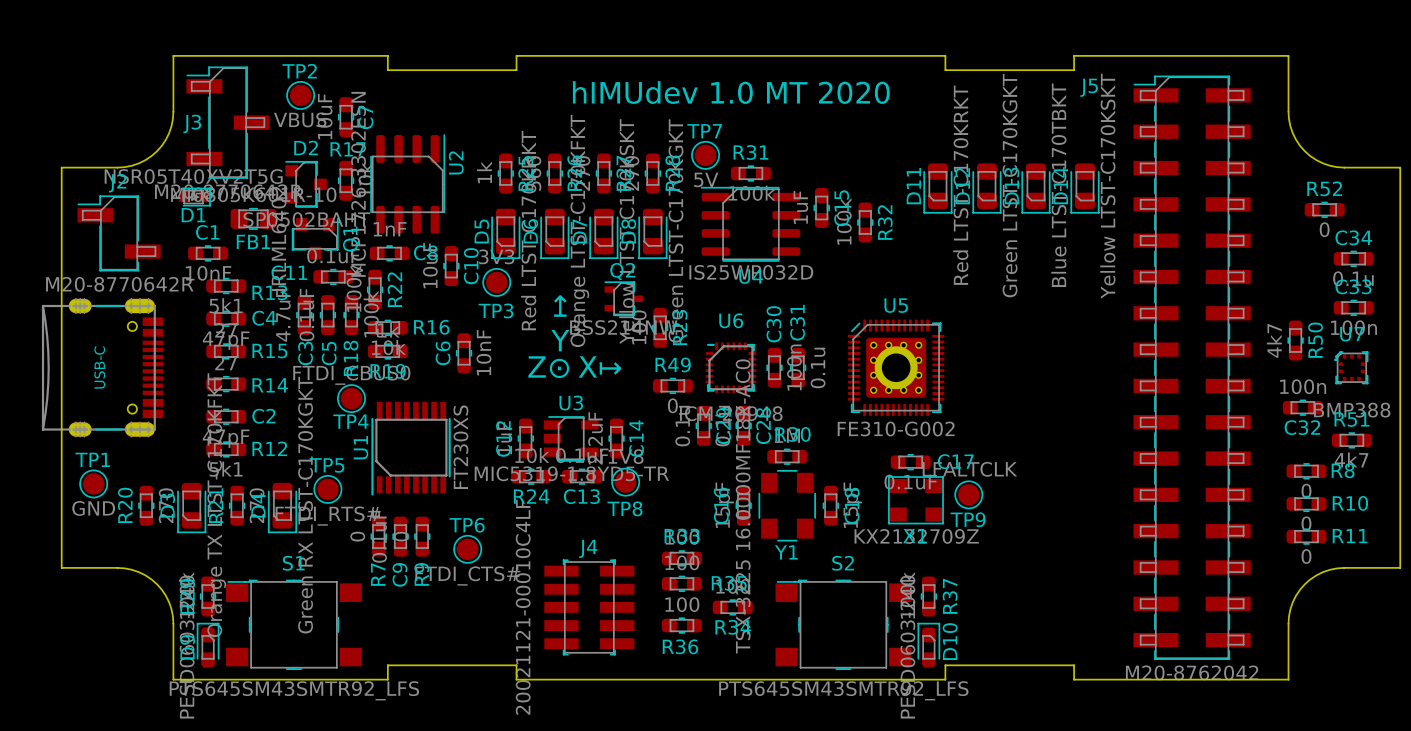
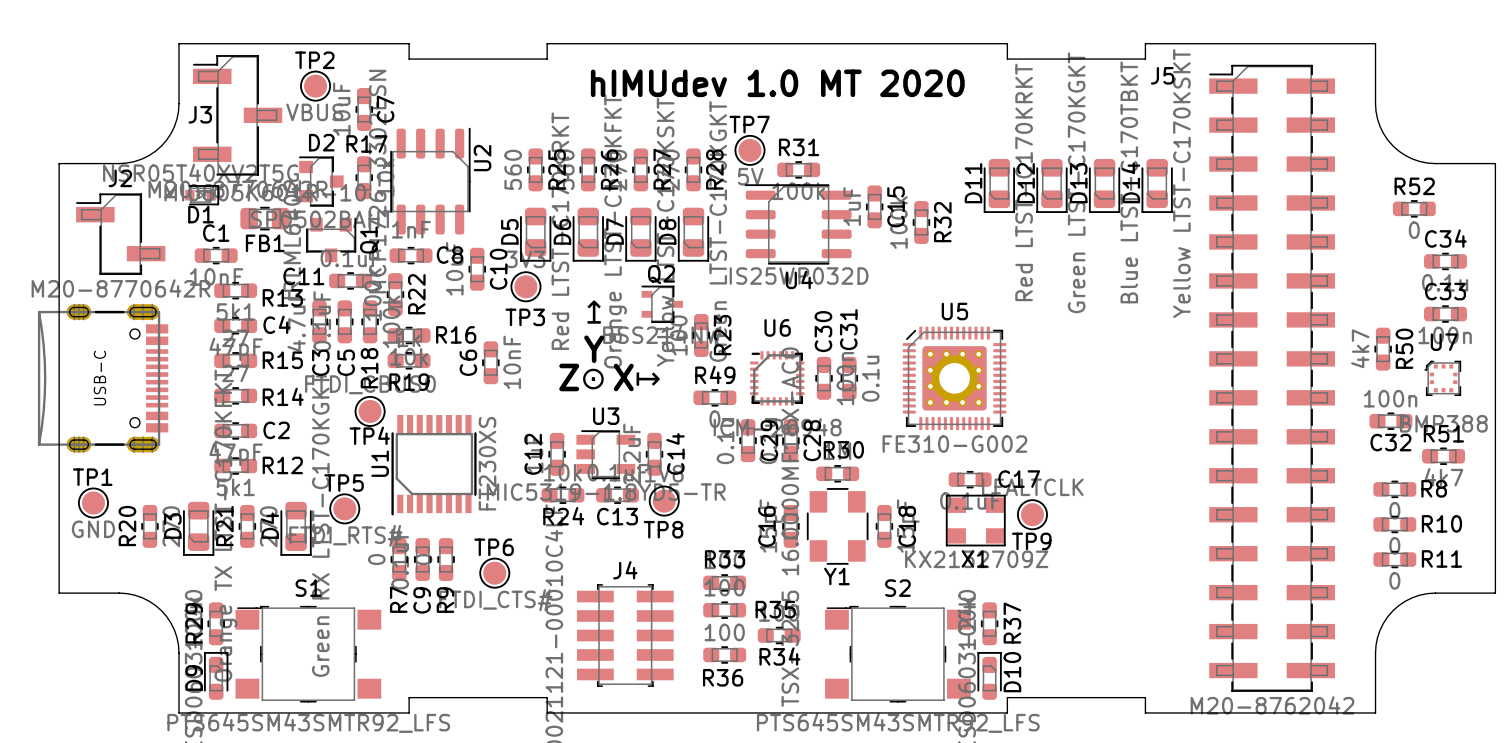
R25 value: 1k (484, 172) -> 560 (513, 169)

